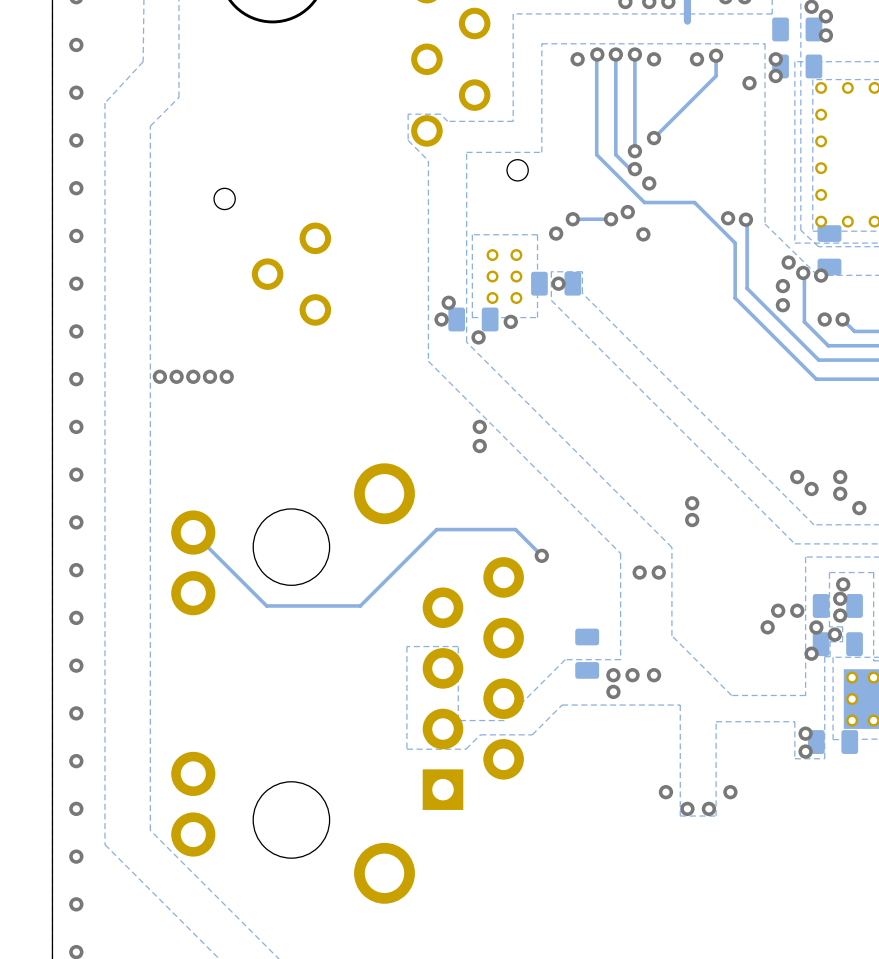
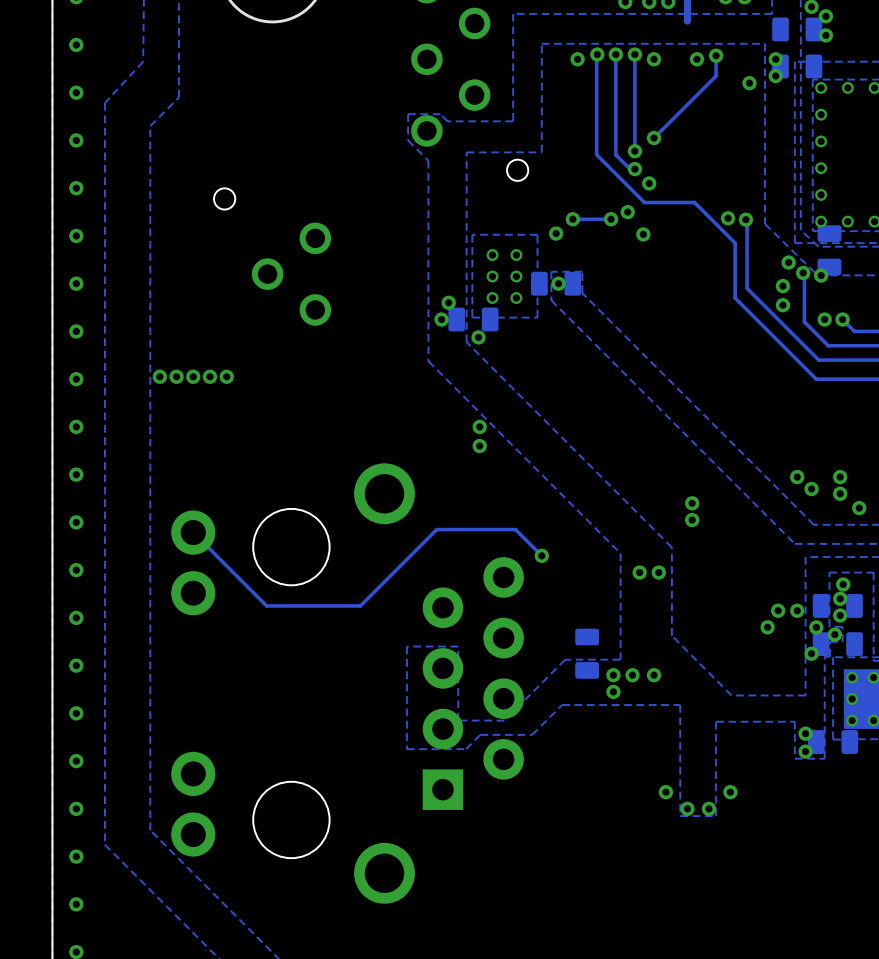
via: (510, 321) -> none

